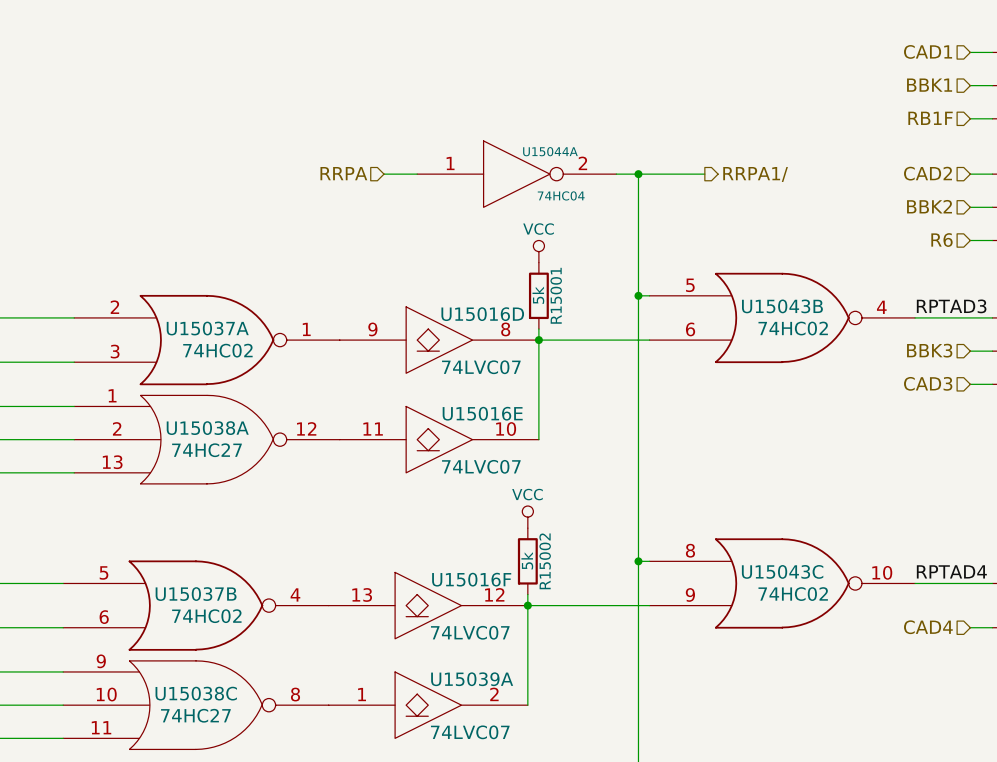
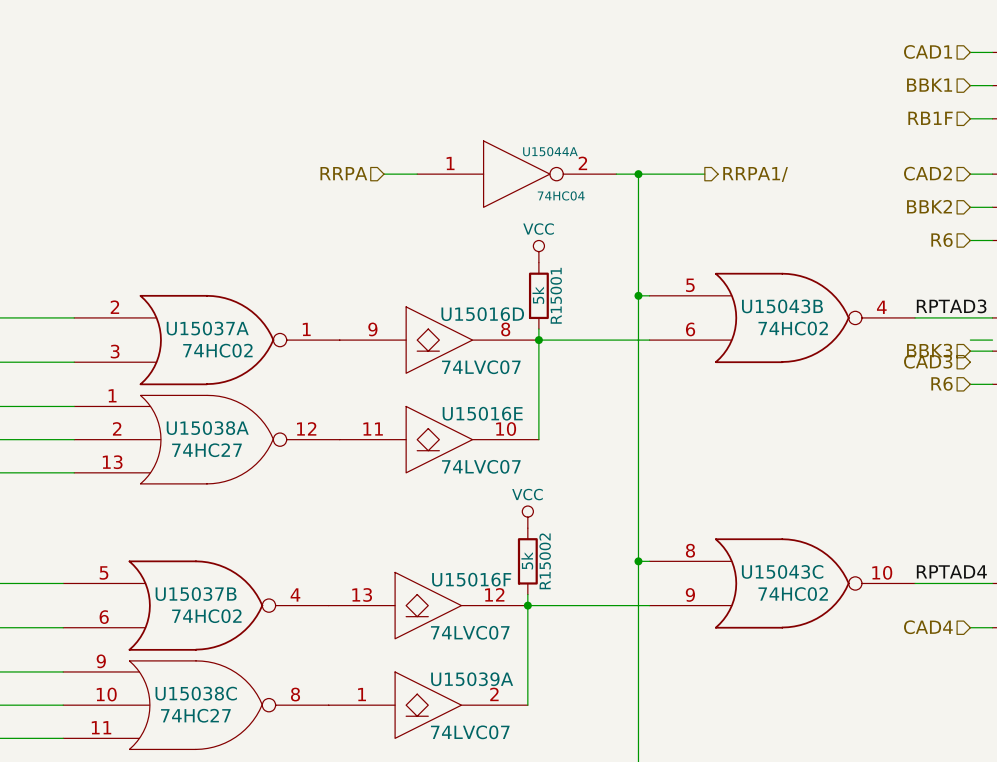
wire: none -> (970, 340) (992, 340)
hierarchical label: none -> CAD3 (928, 361)
hierarchical label: CAD3 (928, 383) -> R6 (941, 383)

